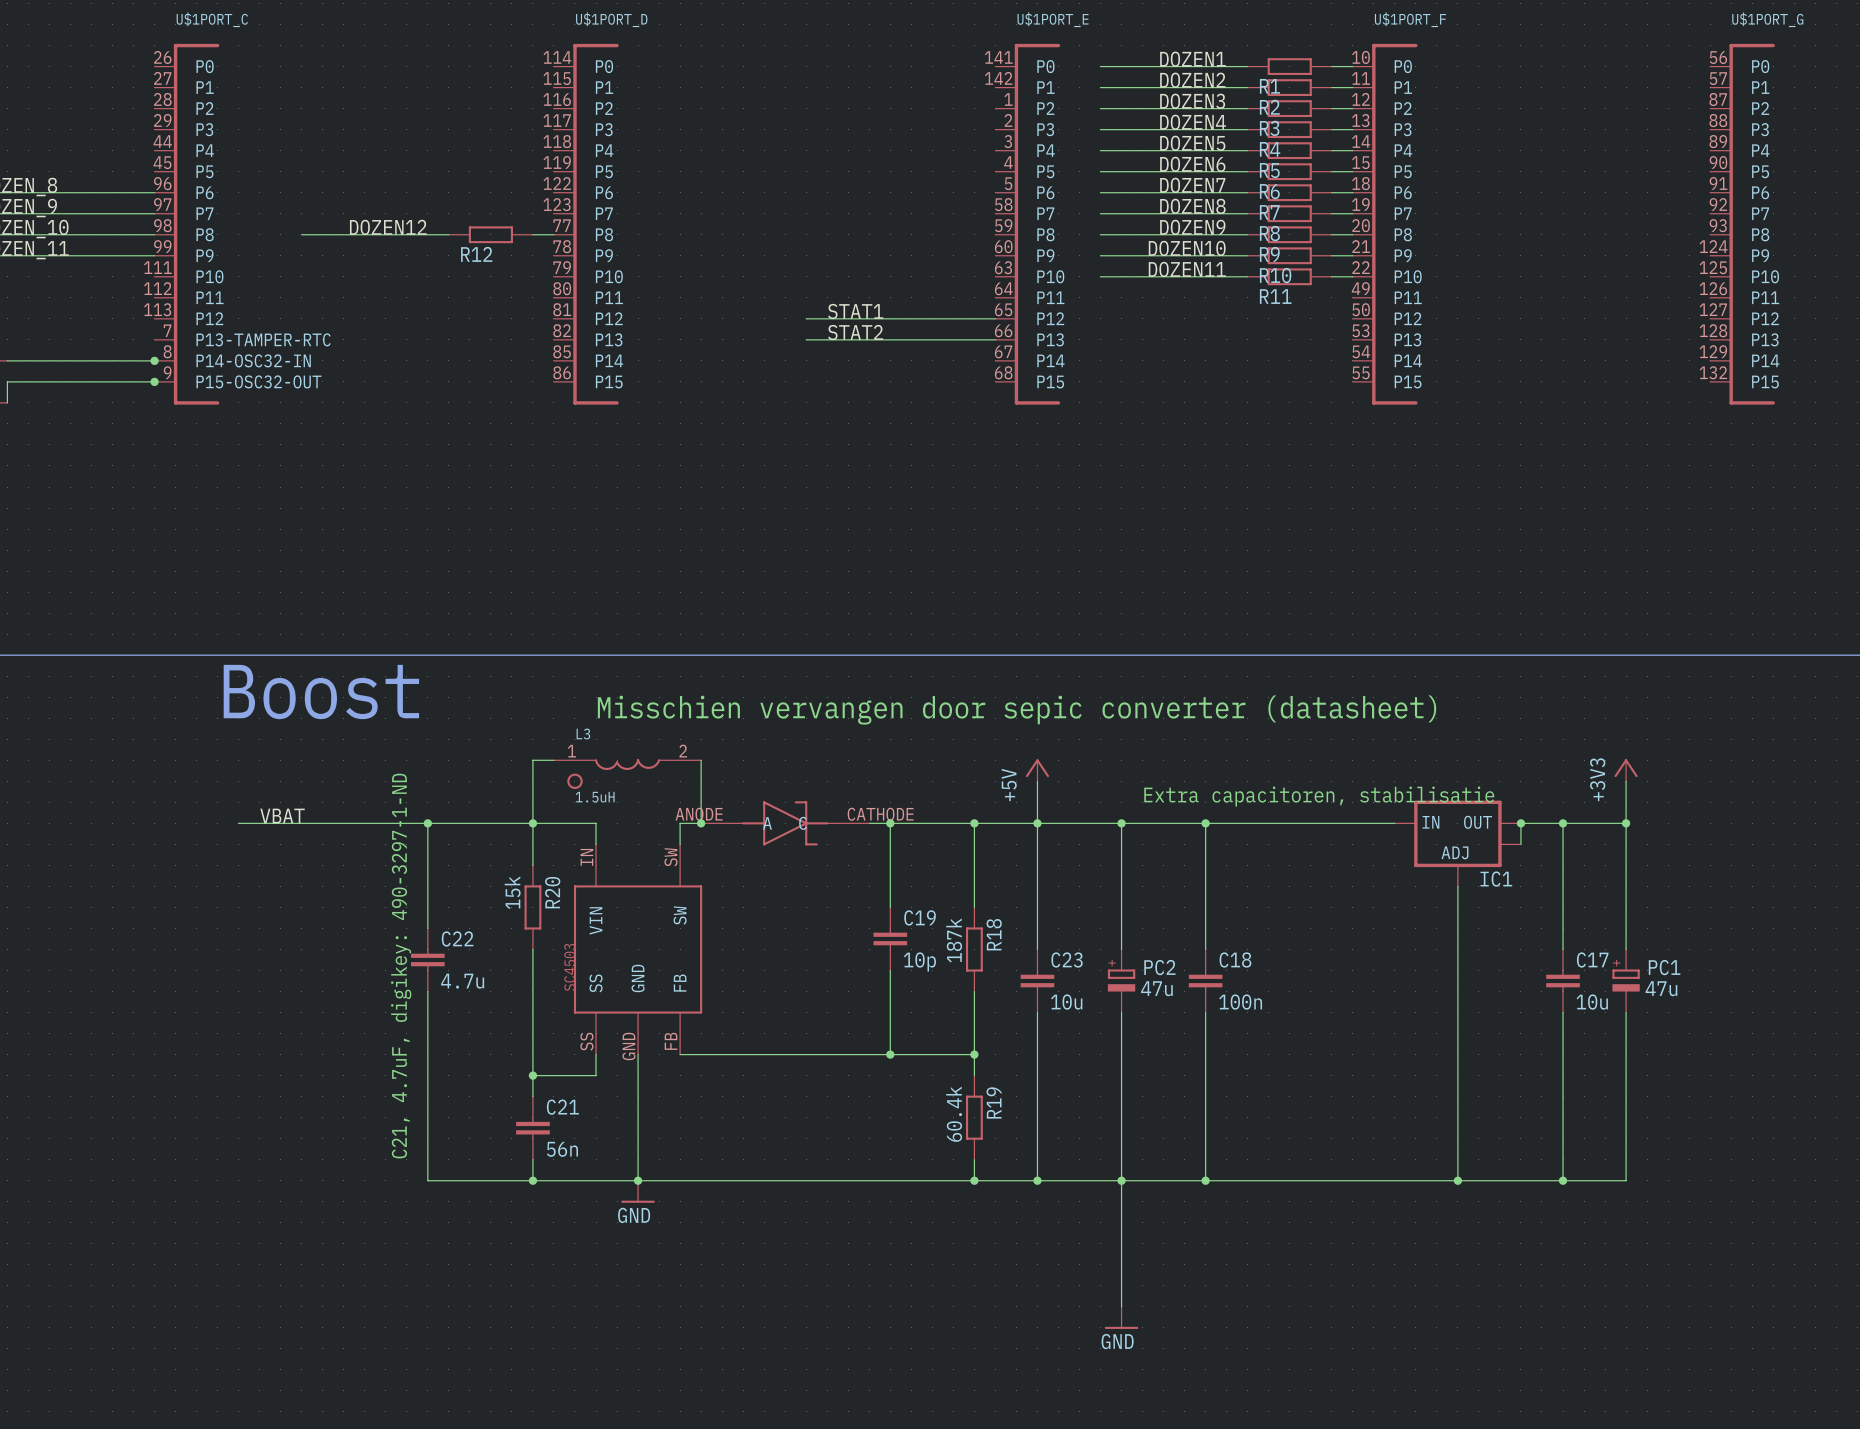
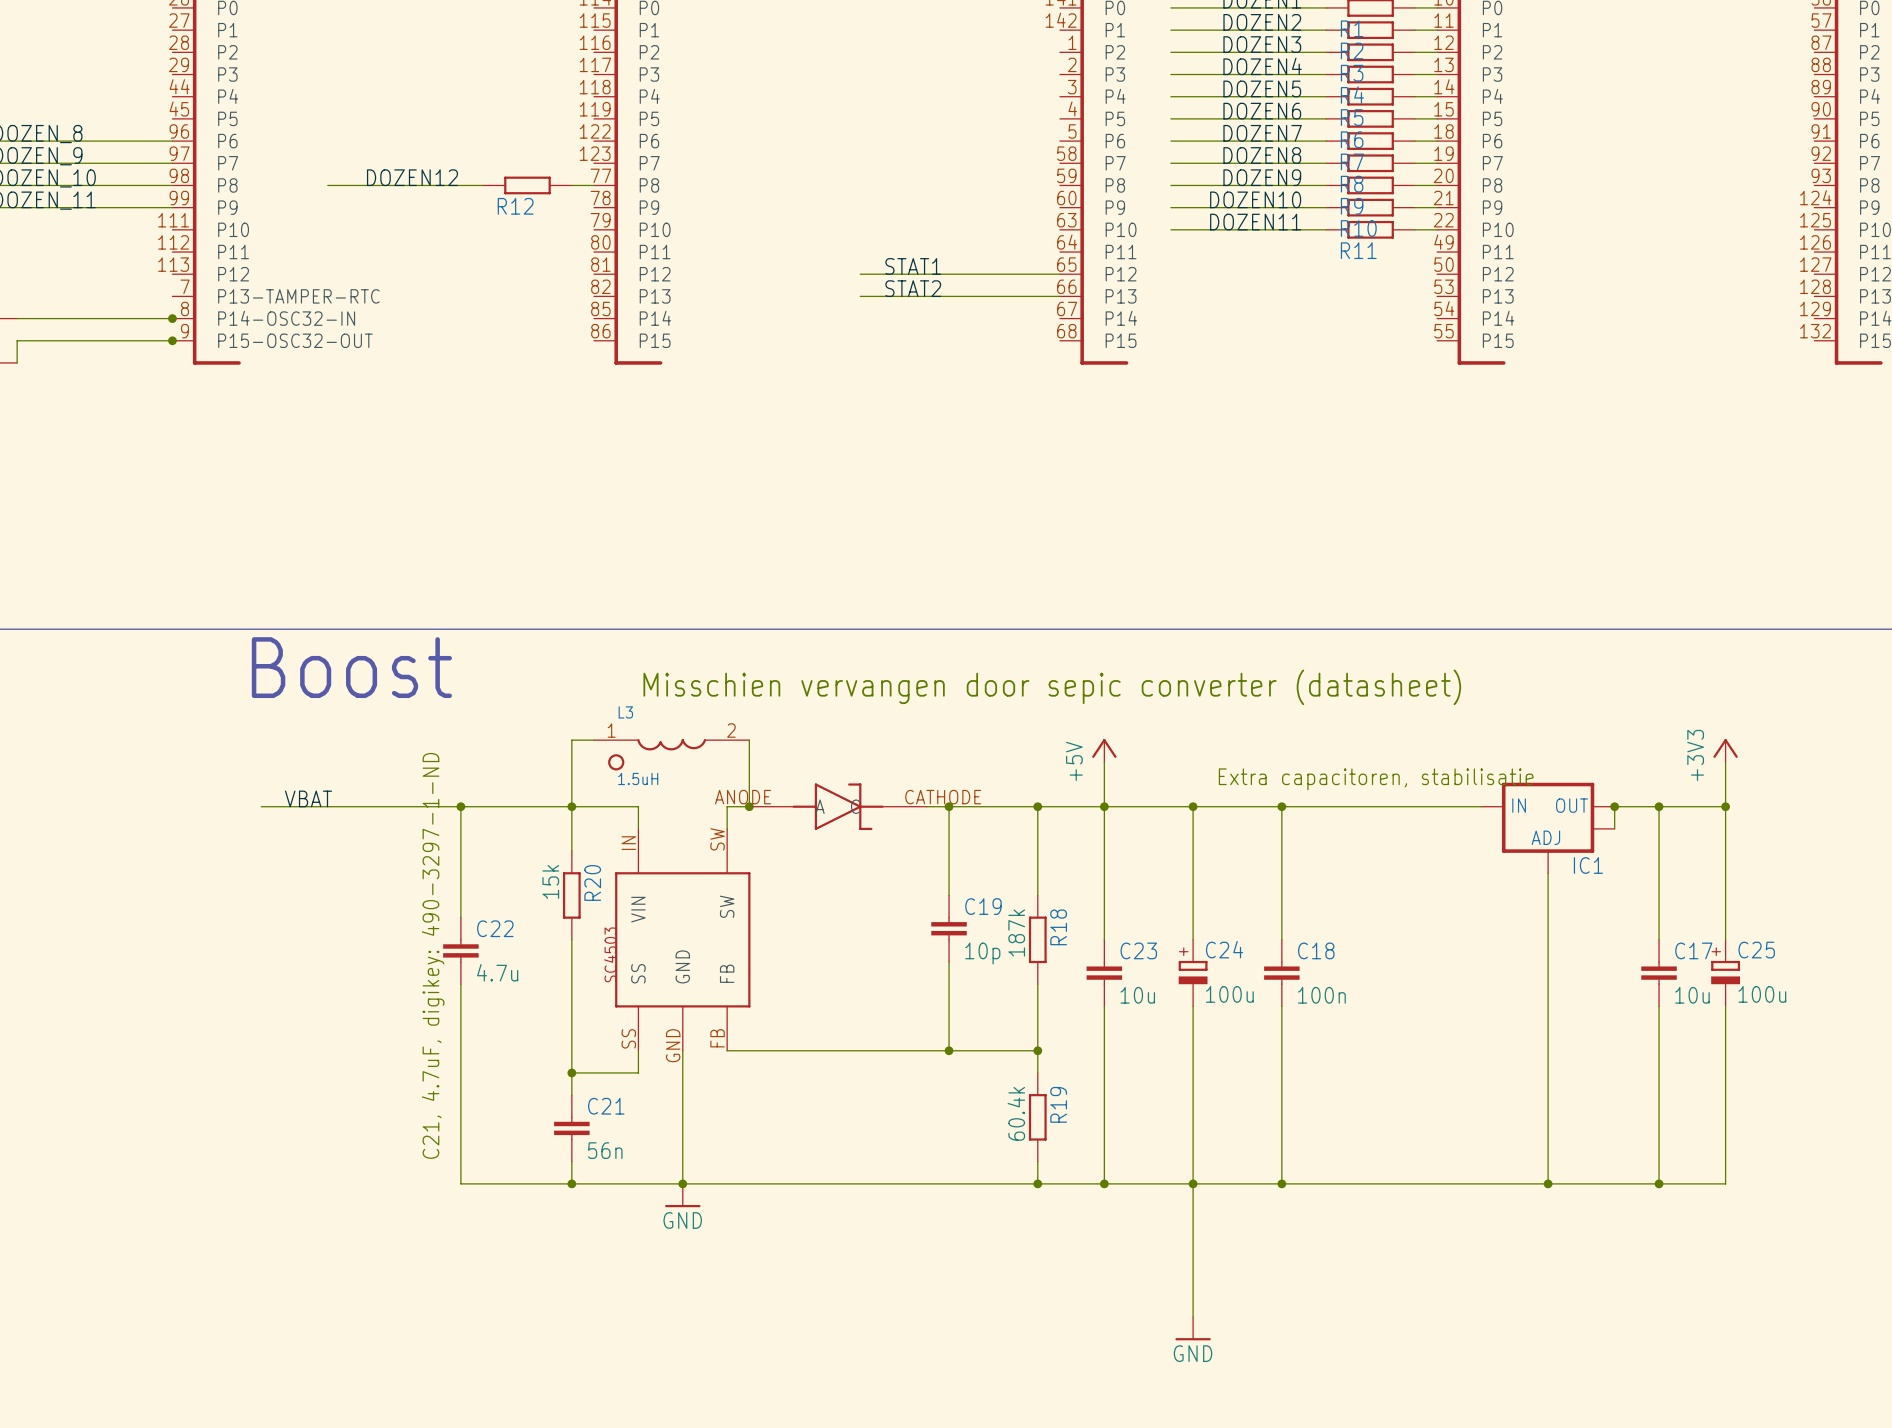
PC2 name: PC2 (1159, 967) -> C24 (1224, 949)
PC1 name: PC1 (1664, 967) -> C25 (1756, 950)
PC2 value: 47u (1156, 988) -> 100u (1229, 994)
PC1 value: 47u (1661, 988) -> 100u (1762, 994)

